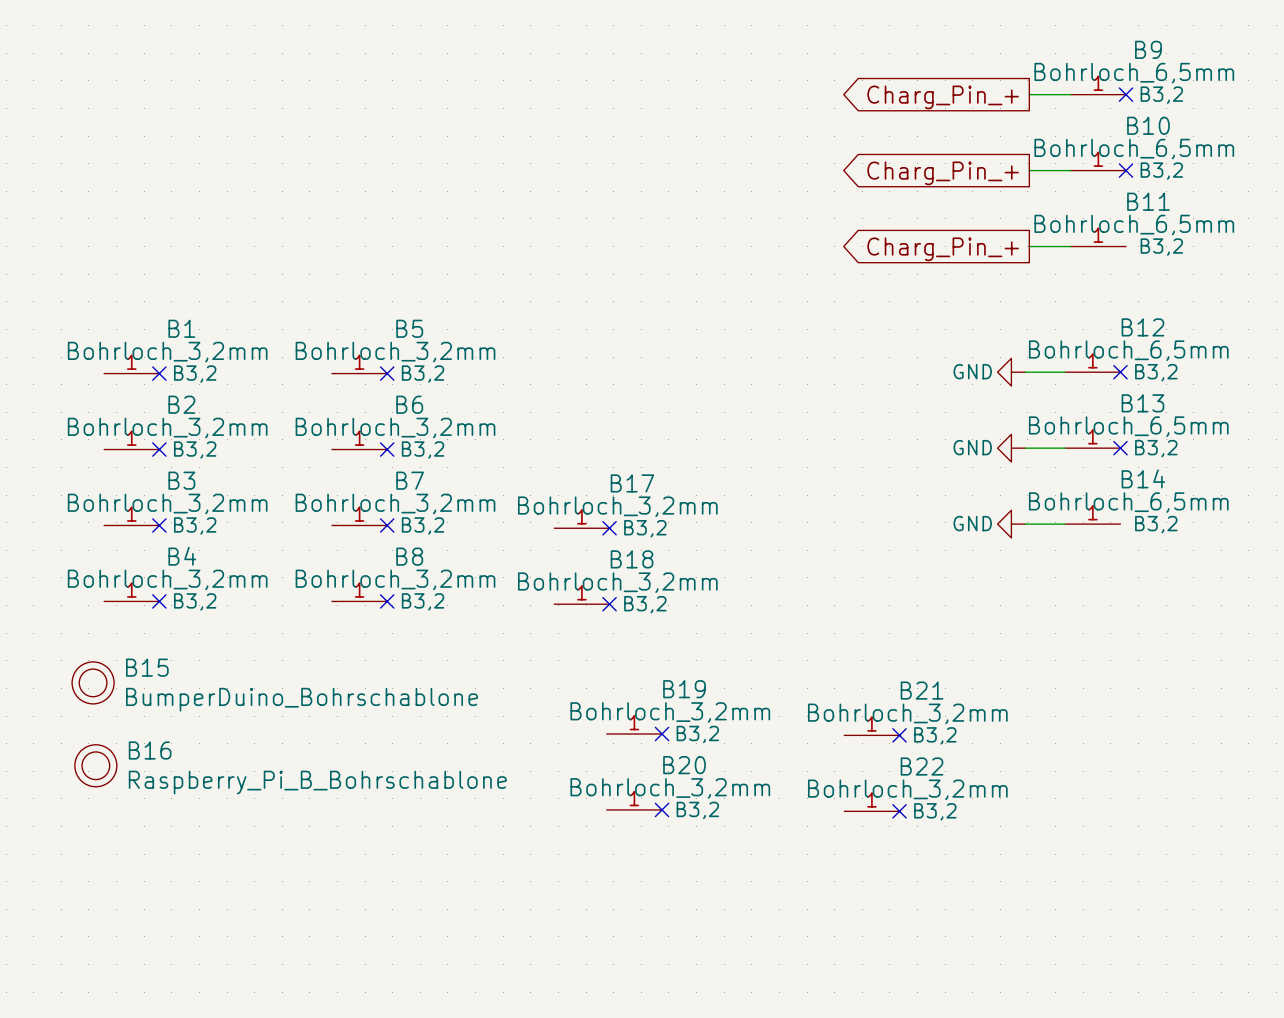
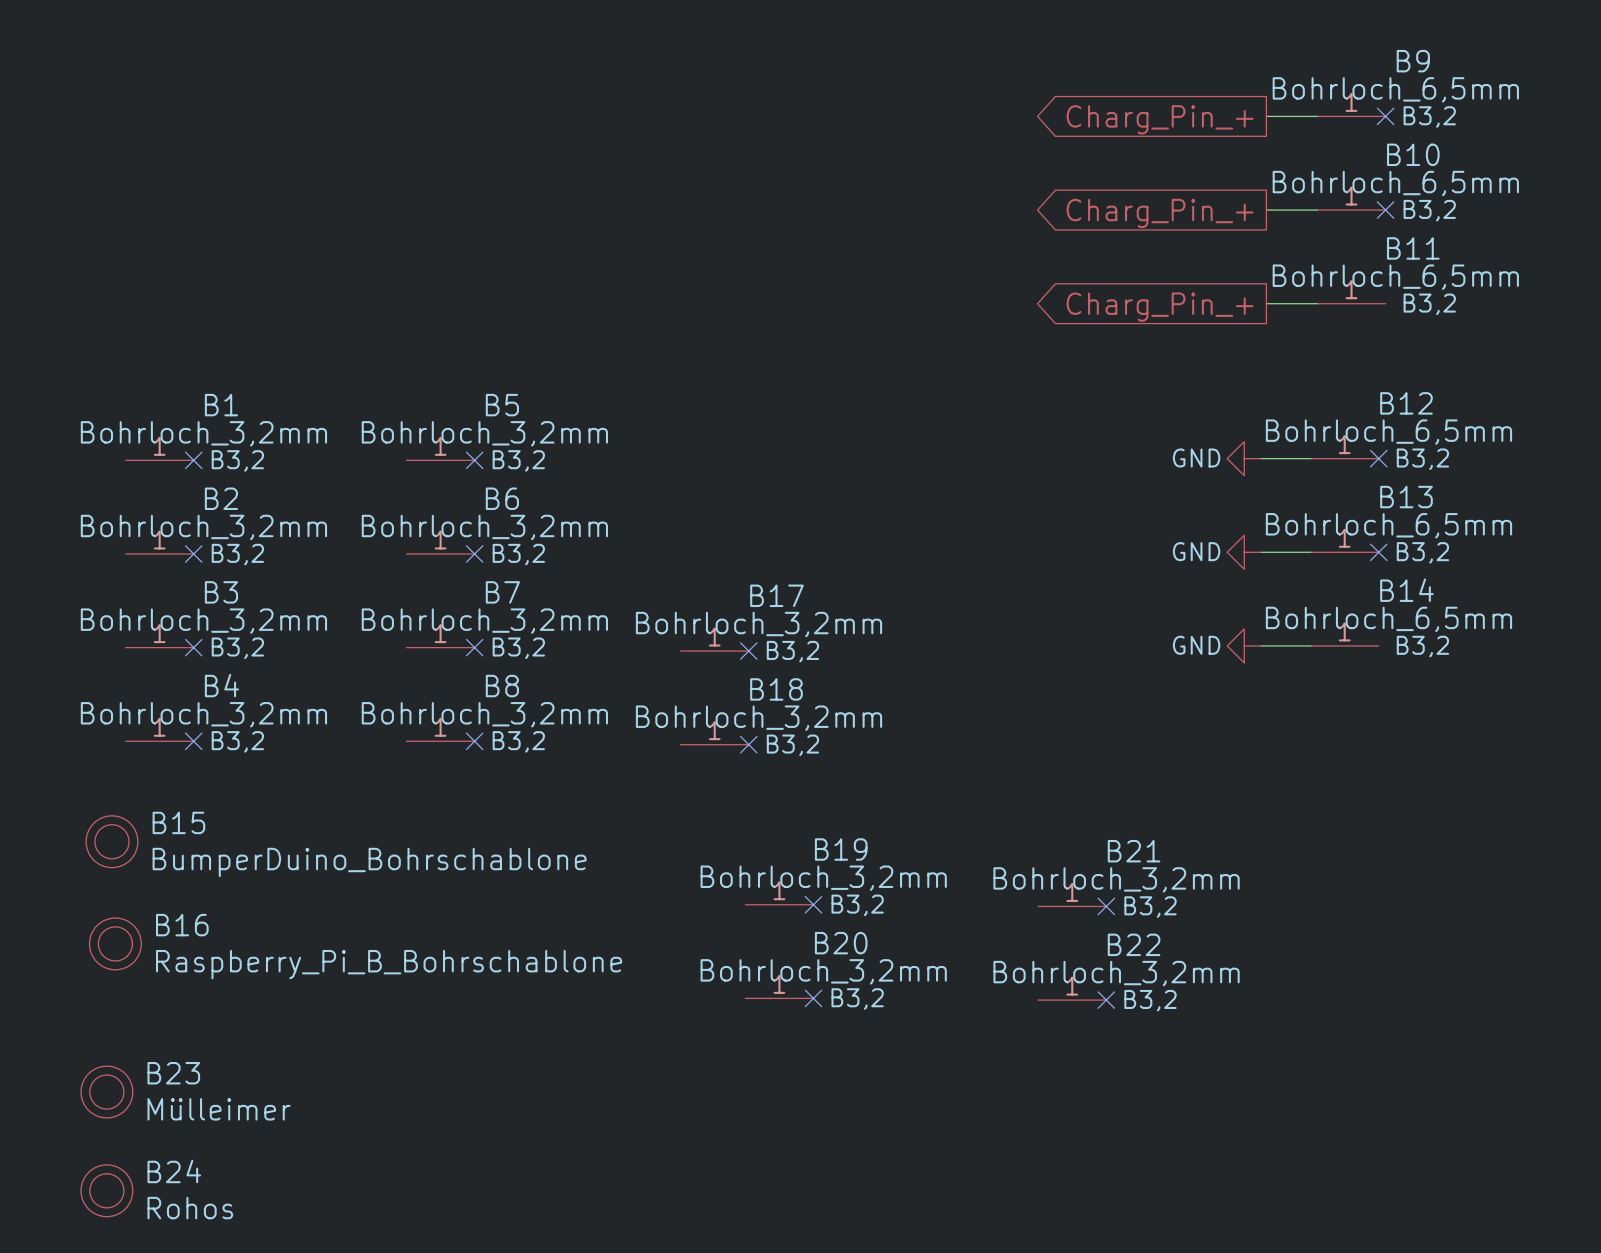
B23: none -> Mülleimer (106, 1092)
B24: none -> Rohos (106, 1190)

